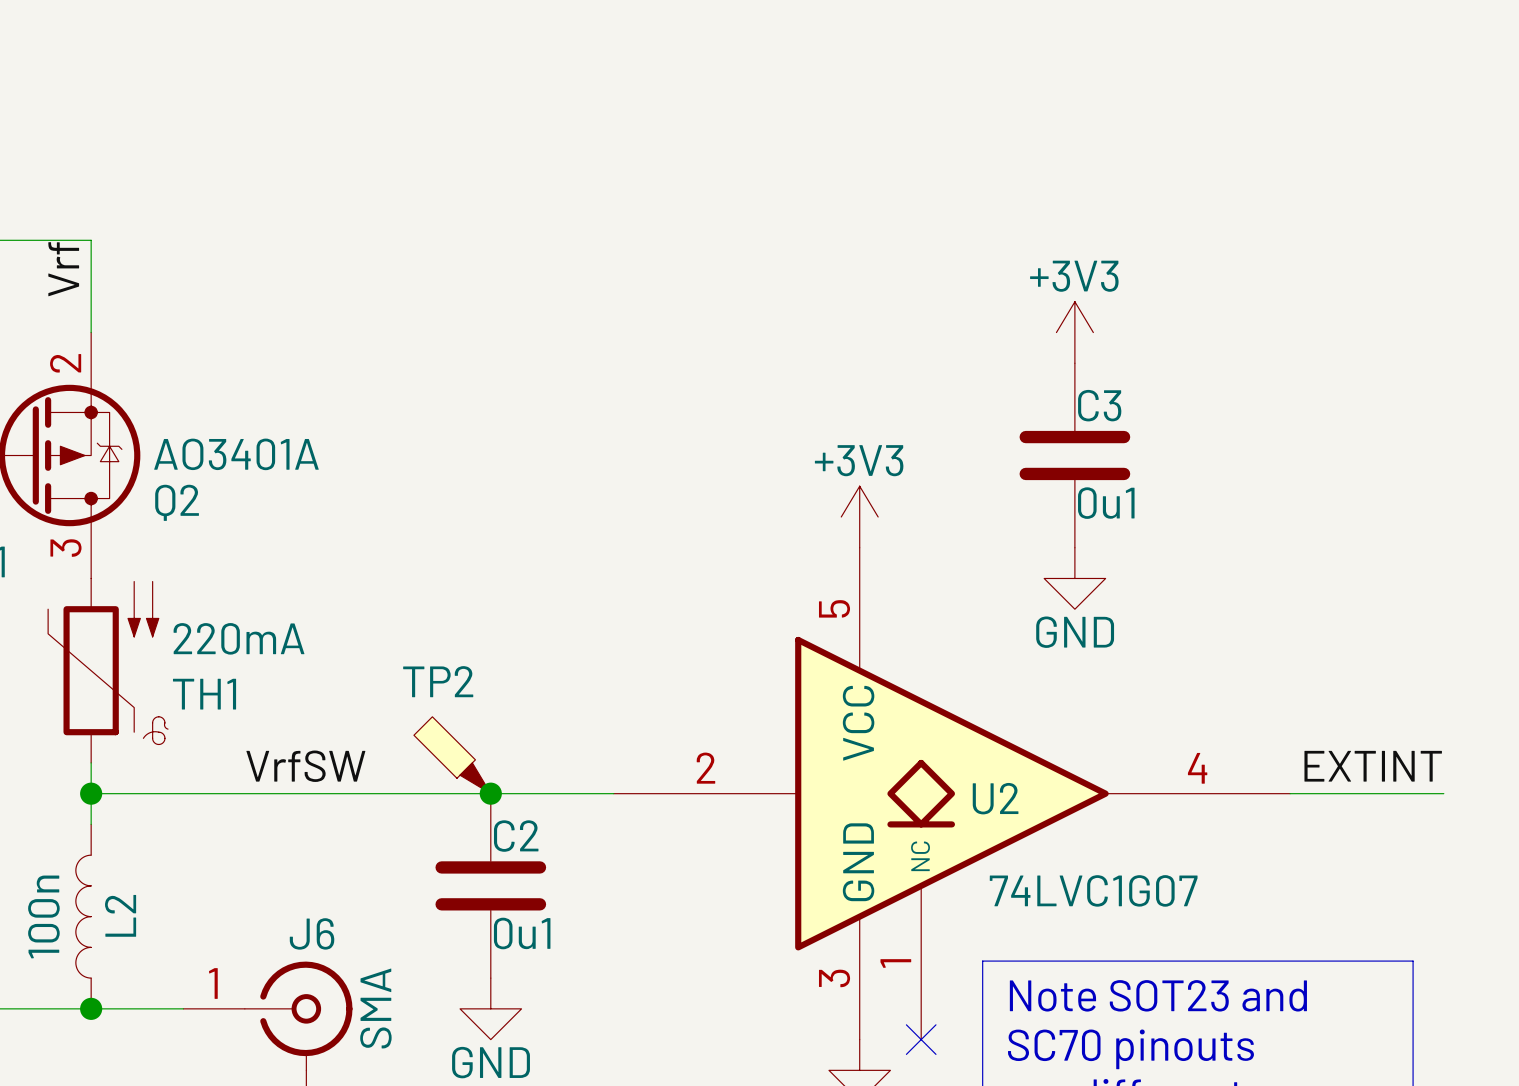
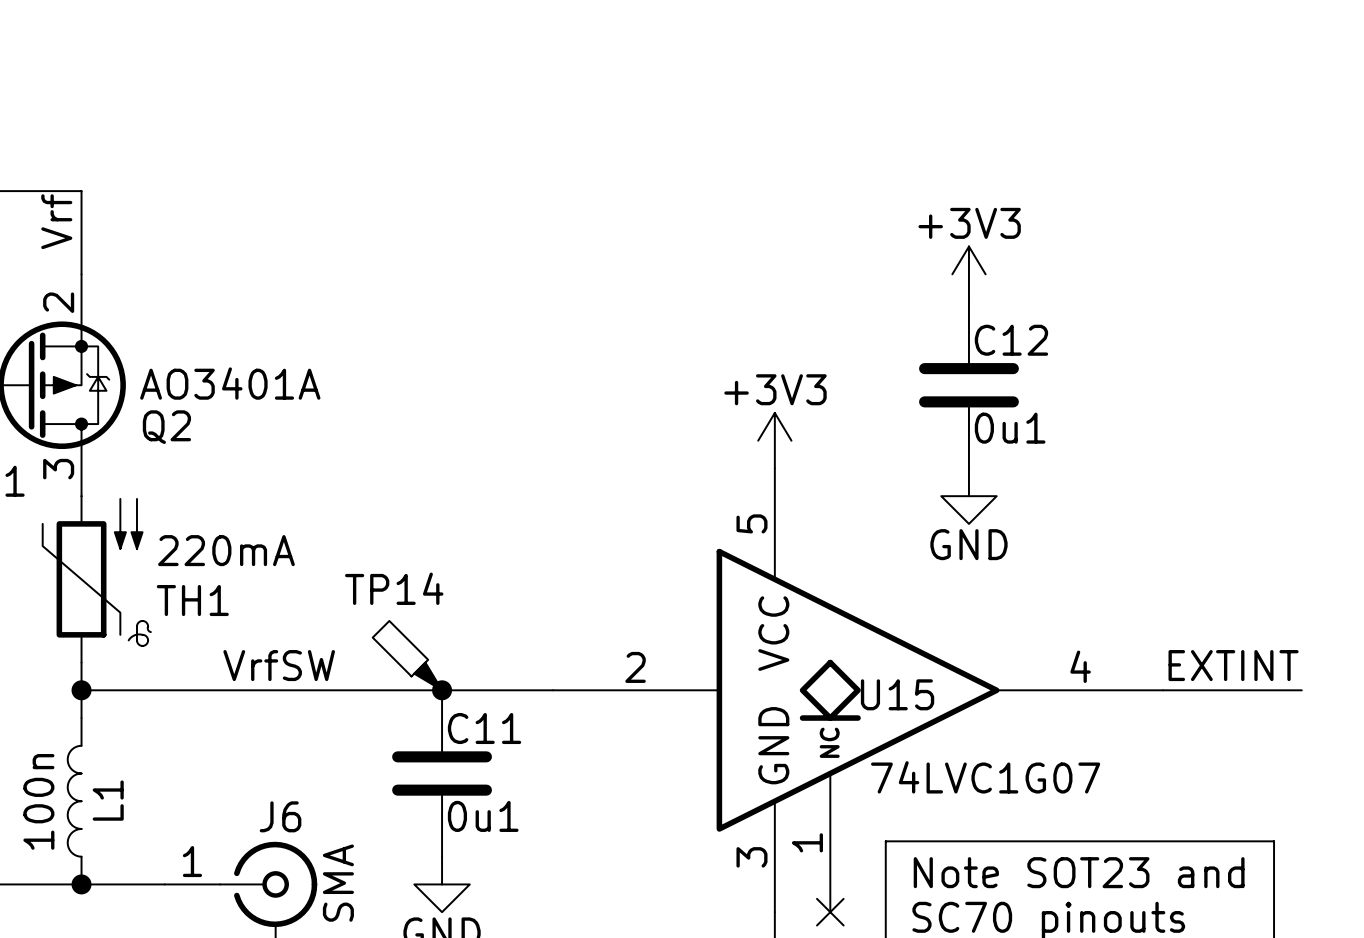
C3 name: C3 (1099, 405) -> C12 (1011, 340)
TP2 name: TP2 (438, 681) -> TP14 (394, 588)
U2 name: U2 (995, 798) -> U15 (897, 694)
C2 name: C2 (516, 836) -> C11 (484, 728)
L2 name: L2 (120, 915) -> L1 (108, 800)

